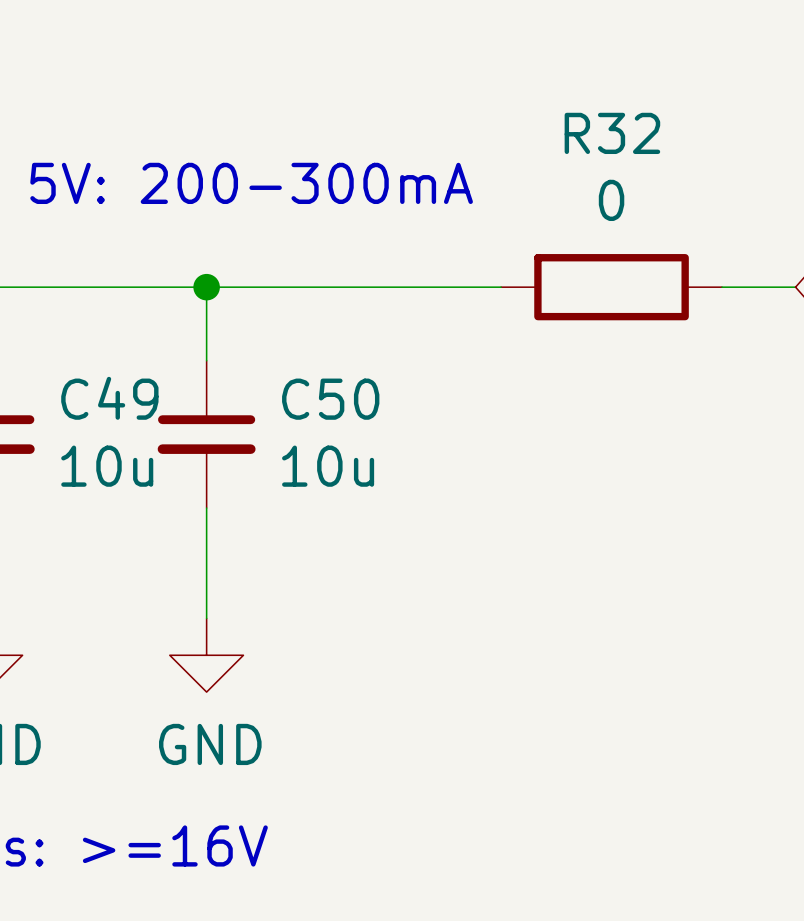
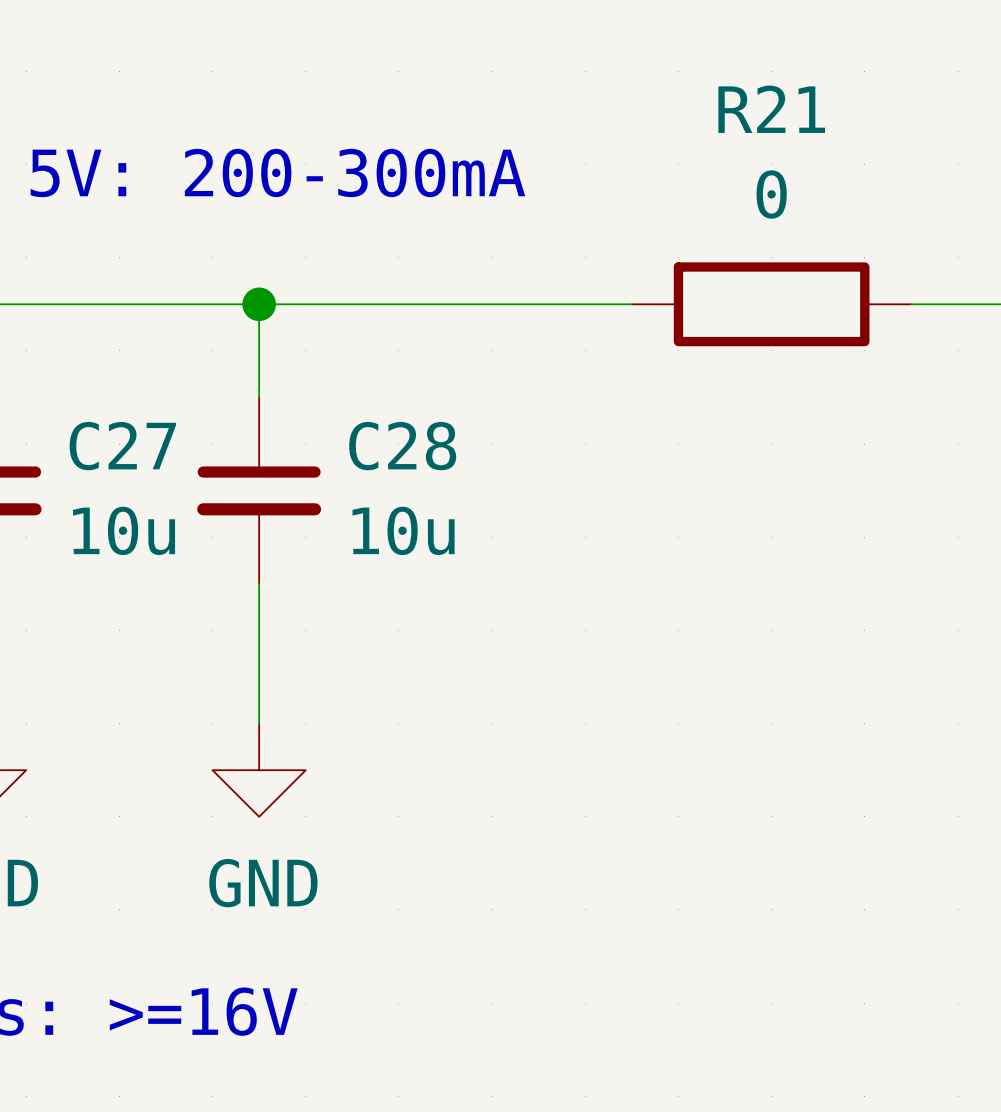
R32 name: R32 (612, 133) -> R21 (771, 109)
C49 name: C49 (109, 398) -> C27 (122, 446)
C50 name: C50 (330, 399) -> C28 (402, 446)

